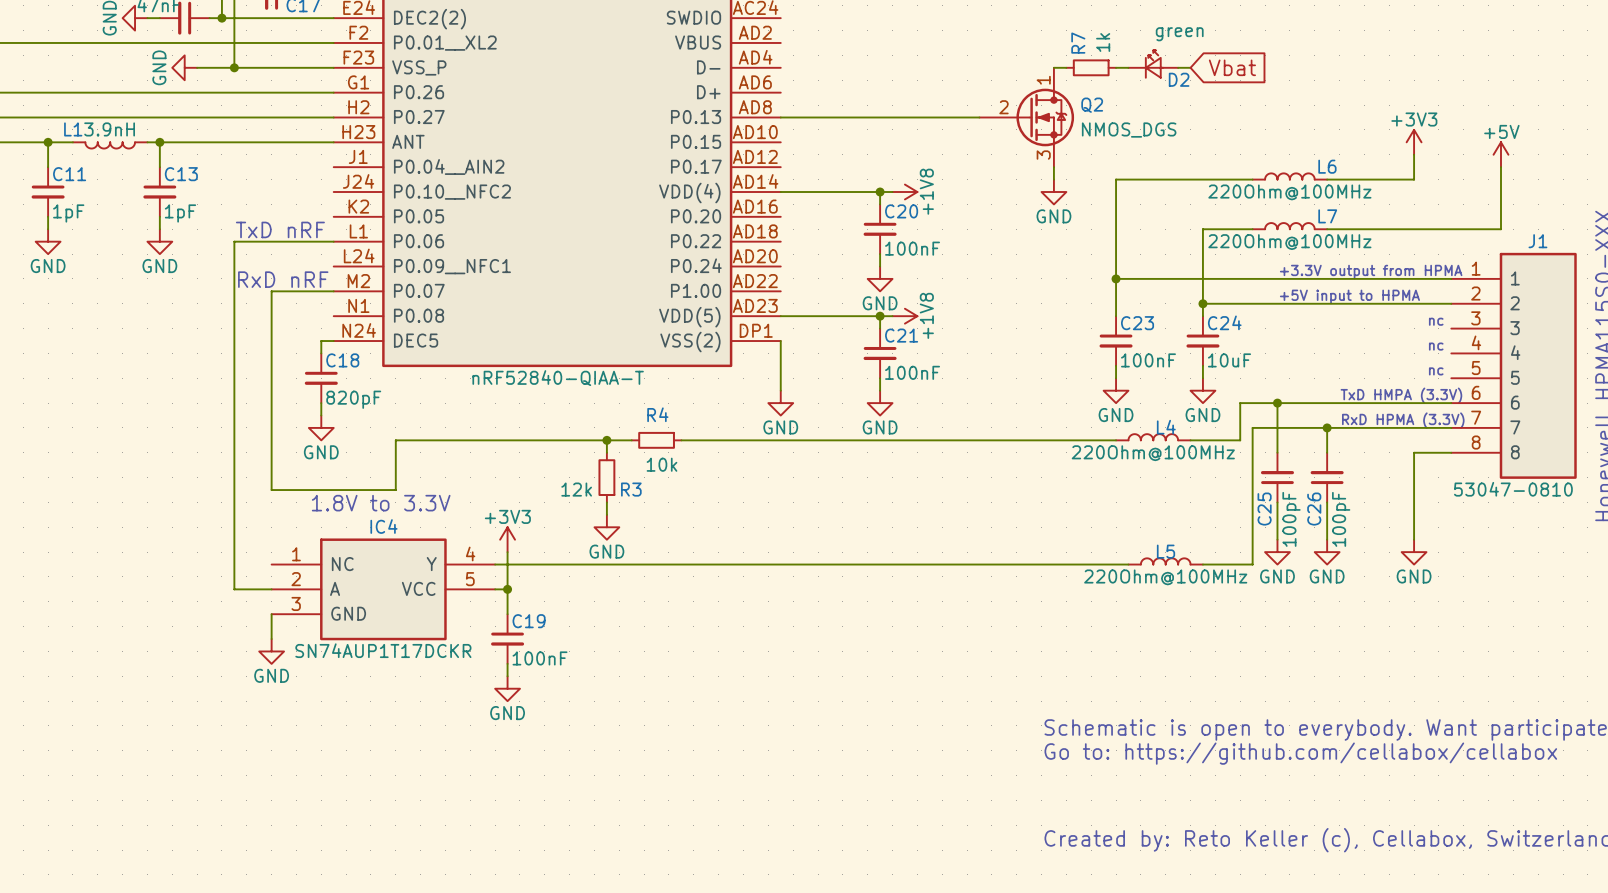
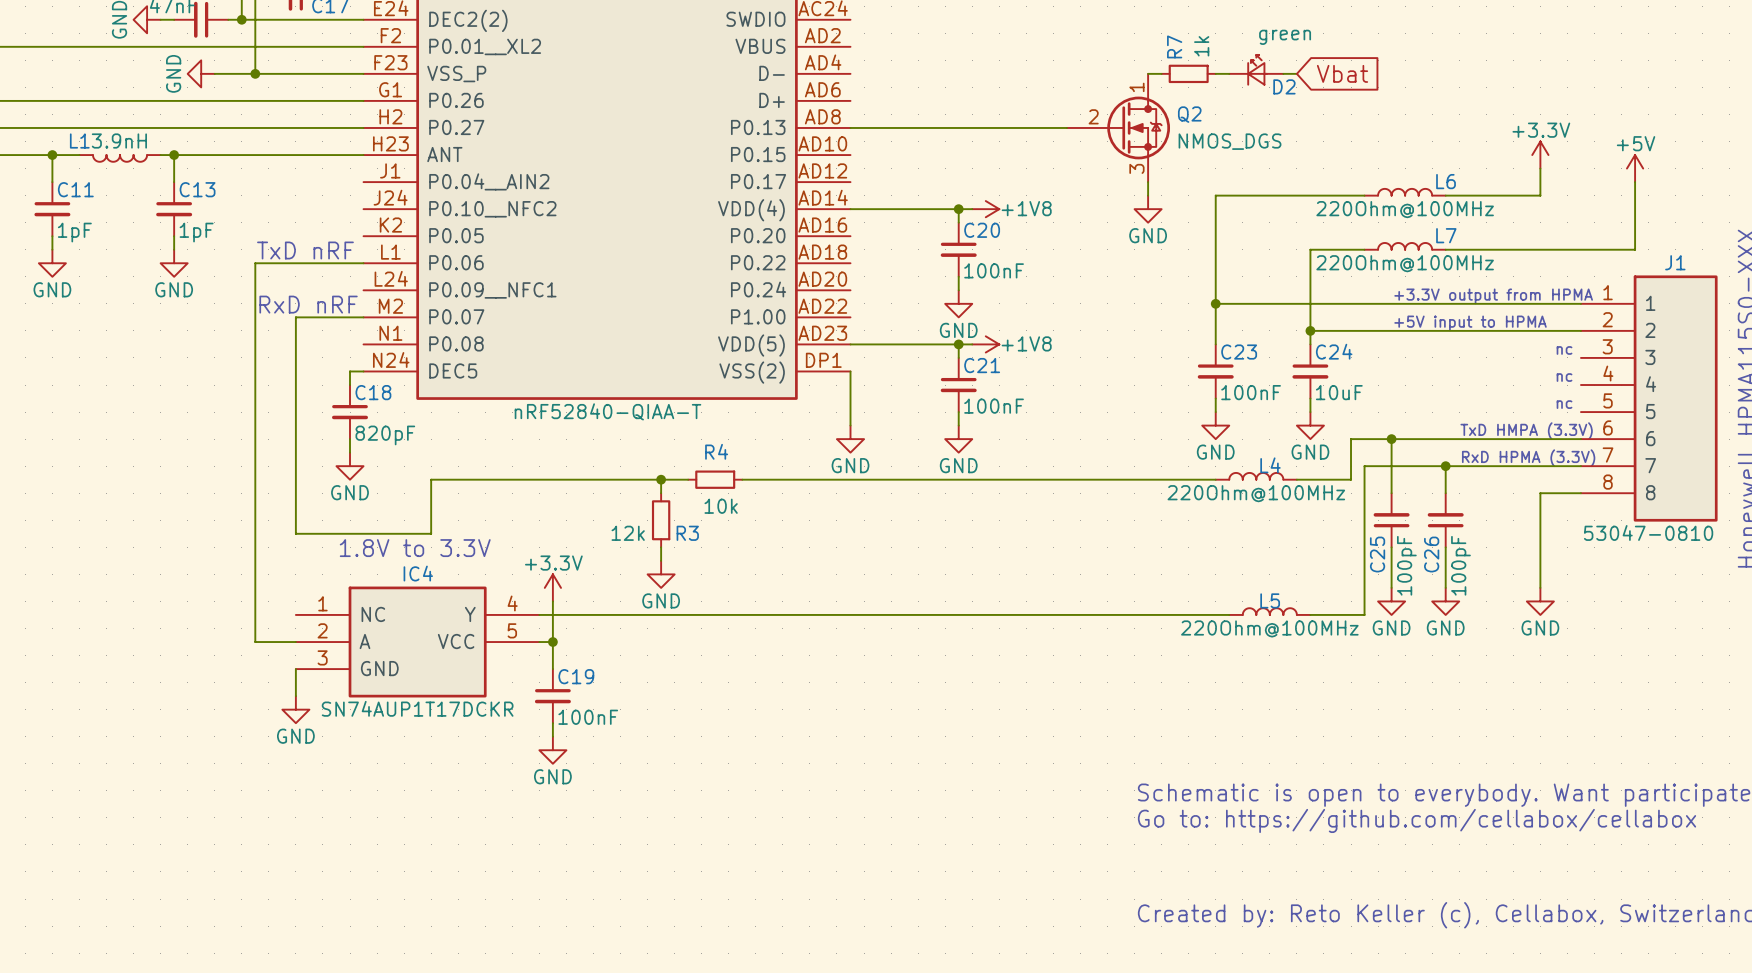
power symbol: +3V3 (1414, 142) -> +3.3V (1540, 155)
power symbol text rotation: 0° (926, 191) -> 90° clockwise (1026, 208)
power symbol text rotation: 0° (926, 315) -> 90° clockwise (1026, 343)
power symbol: +3V3 (507, 539) -> +3.3V (552, 587)

